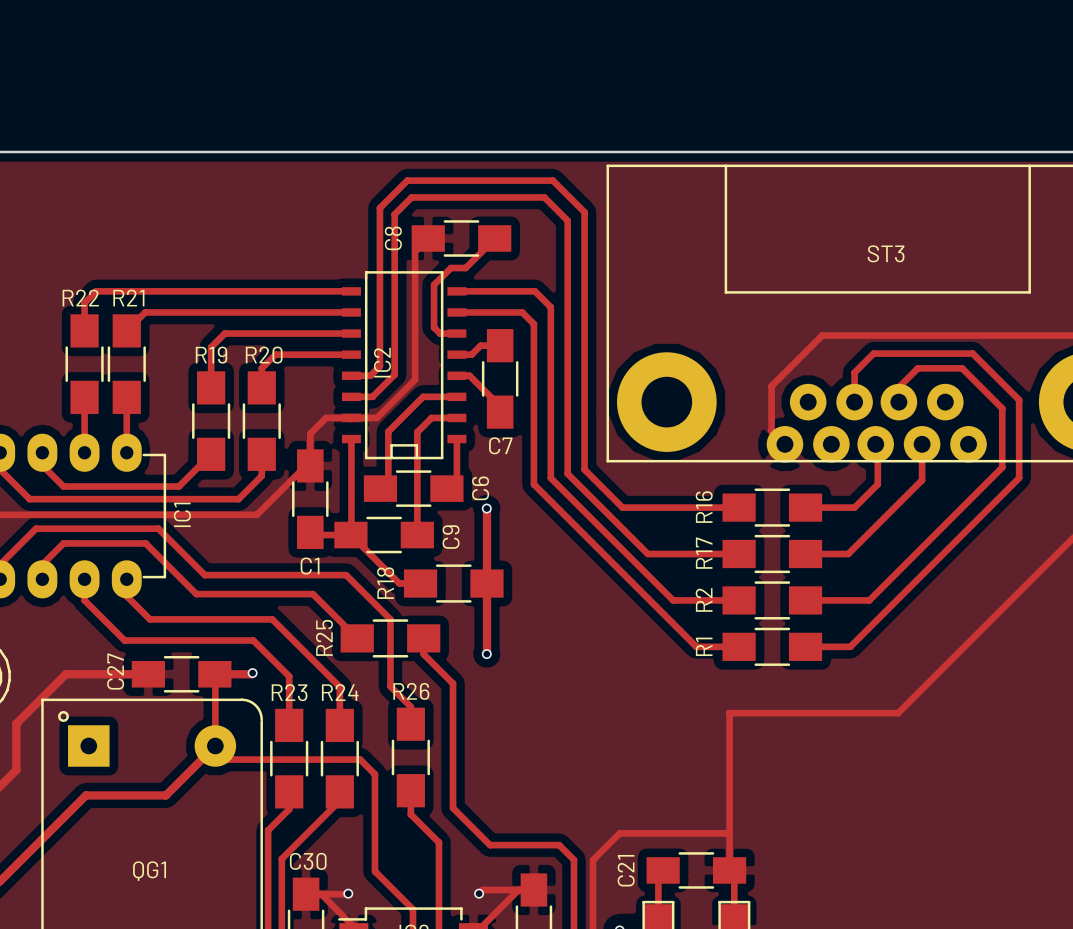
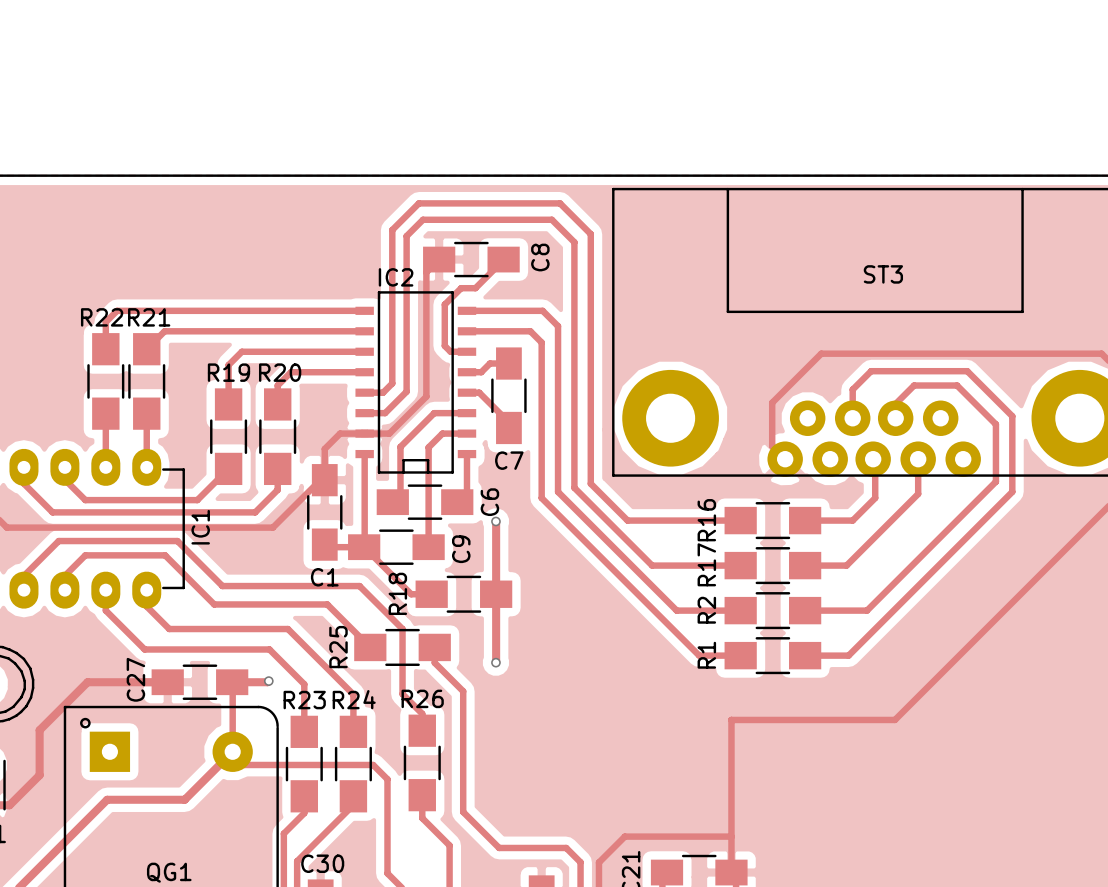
C8 name position: C8 (393, 238) -> C8 (540, 257)
IC2 name rotation: 0° (382, 362) -> 90° clockwise (396, 277)
IC2 name position: IC2 (382, 362) -> IC2 (396, 277)

